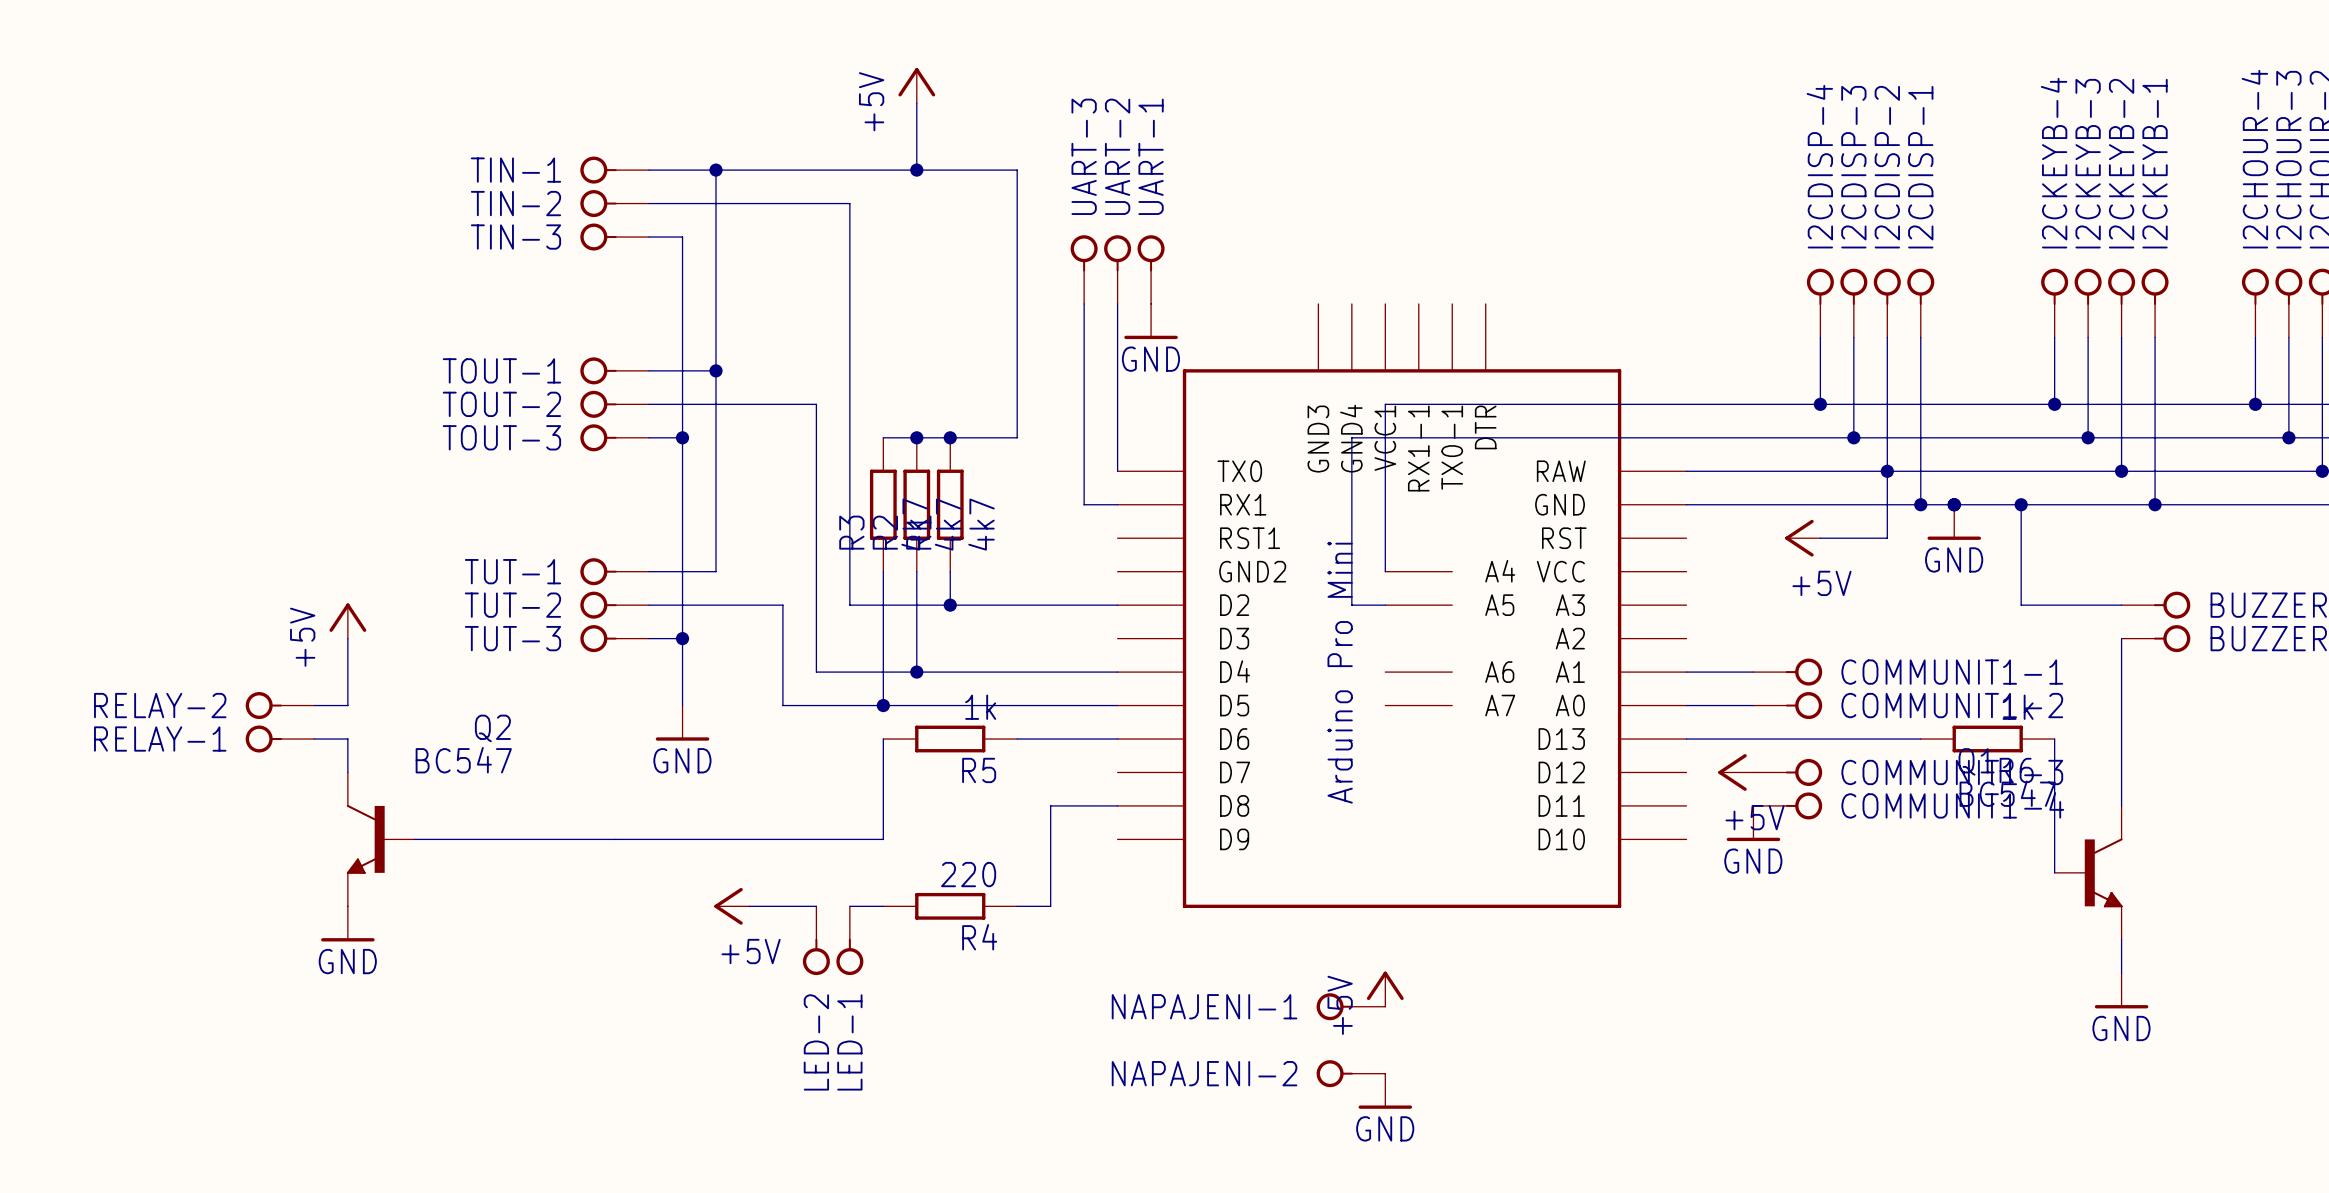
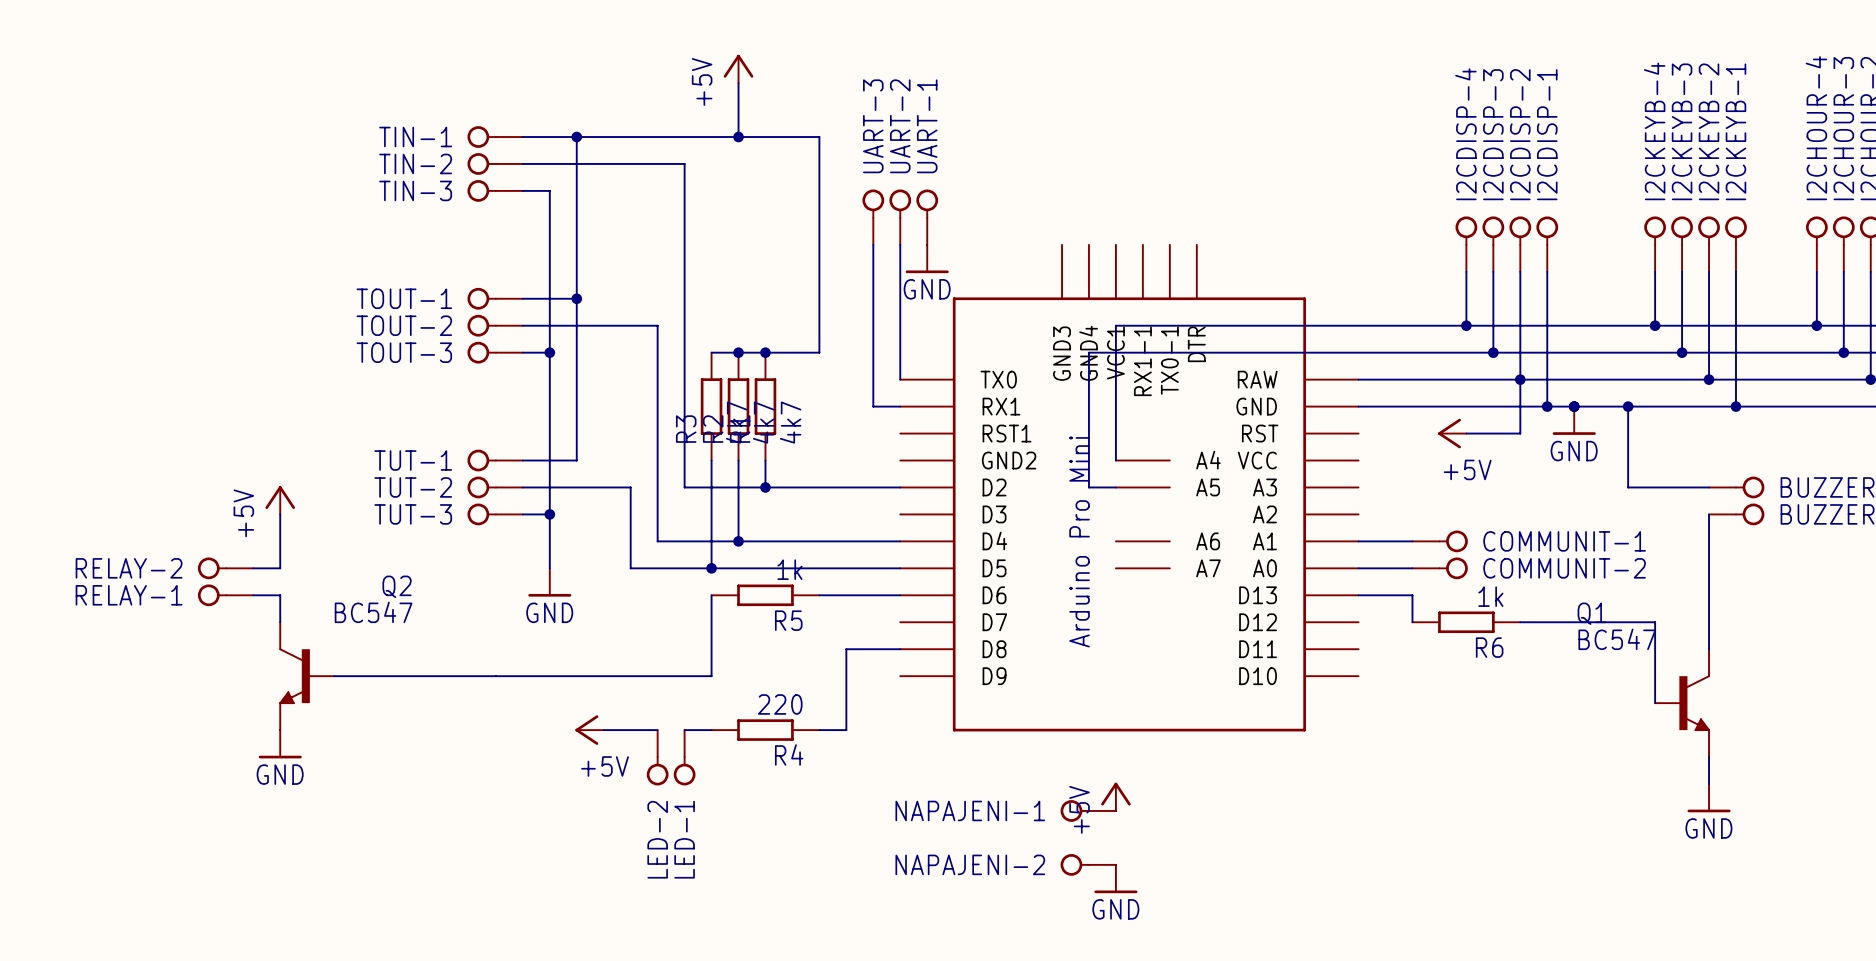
COMMUNIT1-1 name: COMMUNIT1-1 (1952, 672) -> COMMUNIT-1 (1564, 541)
COMMUNIT1-2 name: COMMUNIT1-2 (1952, 705) -> COMMUNIT-2 (1564, 568)
wire: (1753, 739) (1920, 739) -> (1412, 595) (1412, 622)
R6 position: (1987, 739) -> (1466, 622)
wire: (2054, 739) (2054, 772) -> (1520, 622) (1655, 622)
power symbol: +5V (1735, 772) -> none
COMMUNIT1-3: (1787, 772) -> none
COMMUNIT1-4: (1787, 805) -> none
power symbol: GND (1753, 823) -> none

